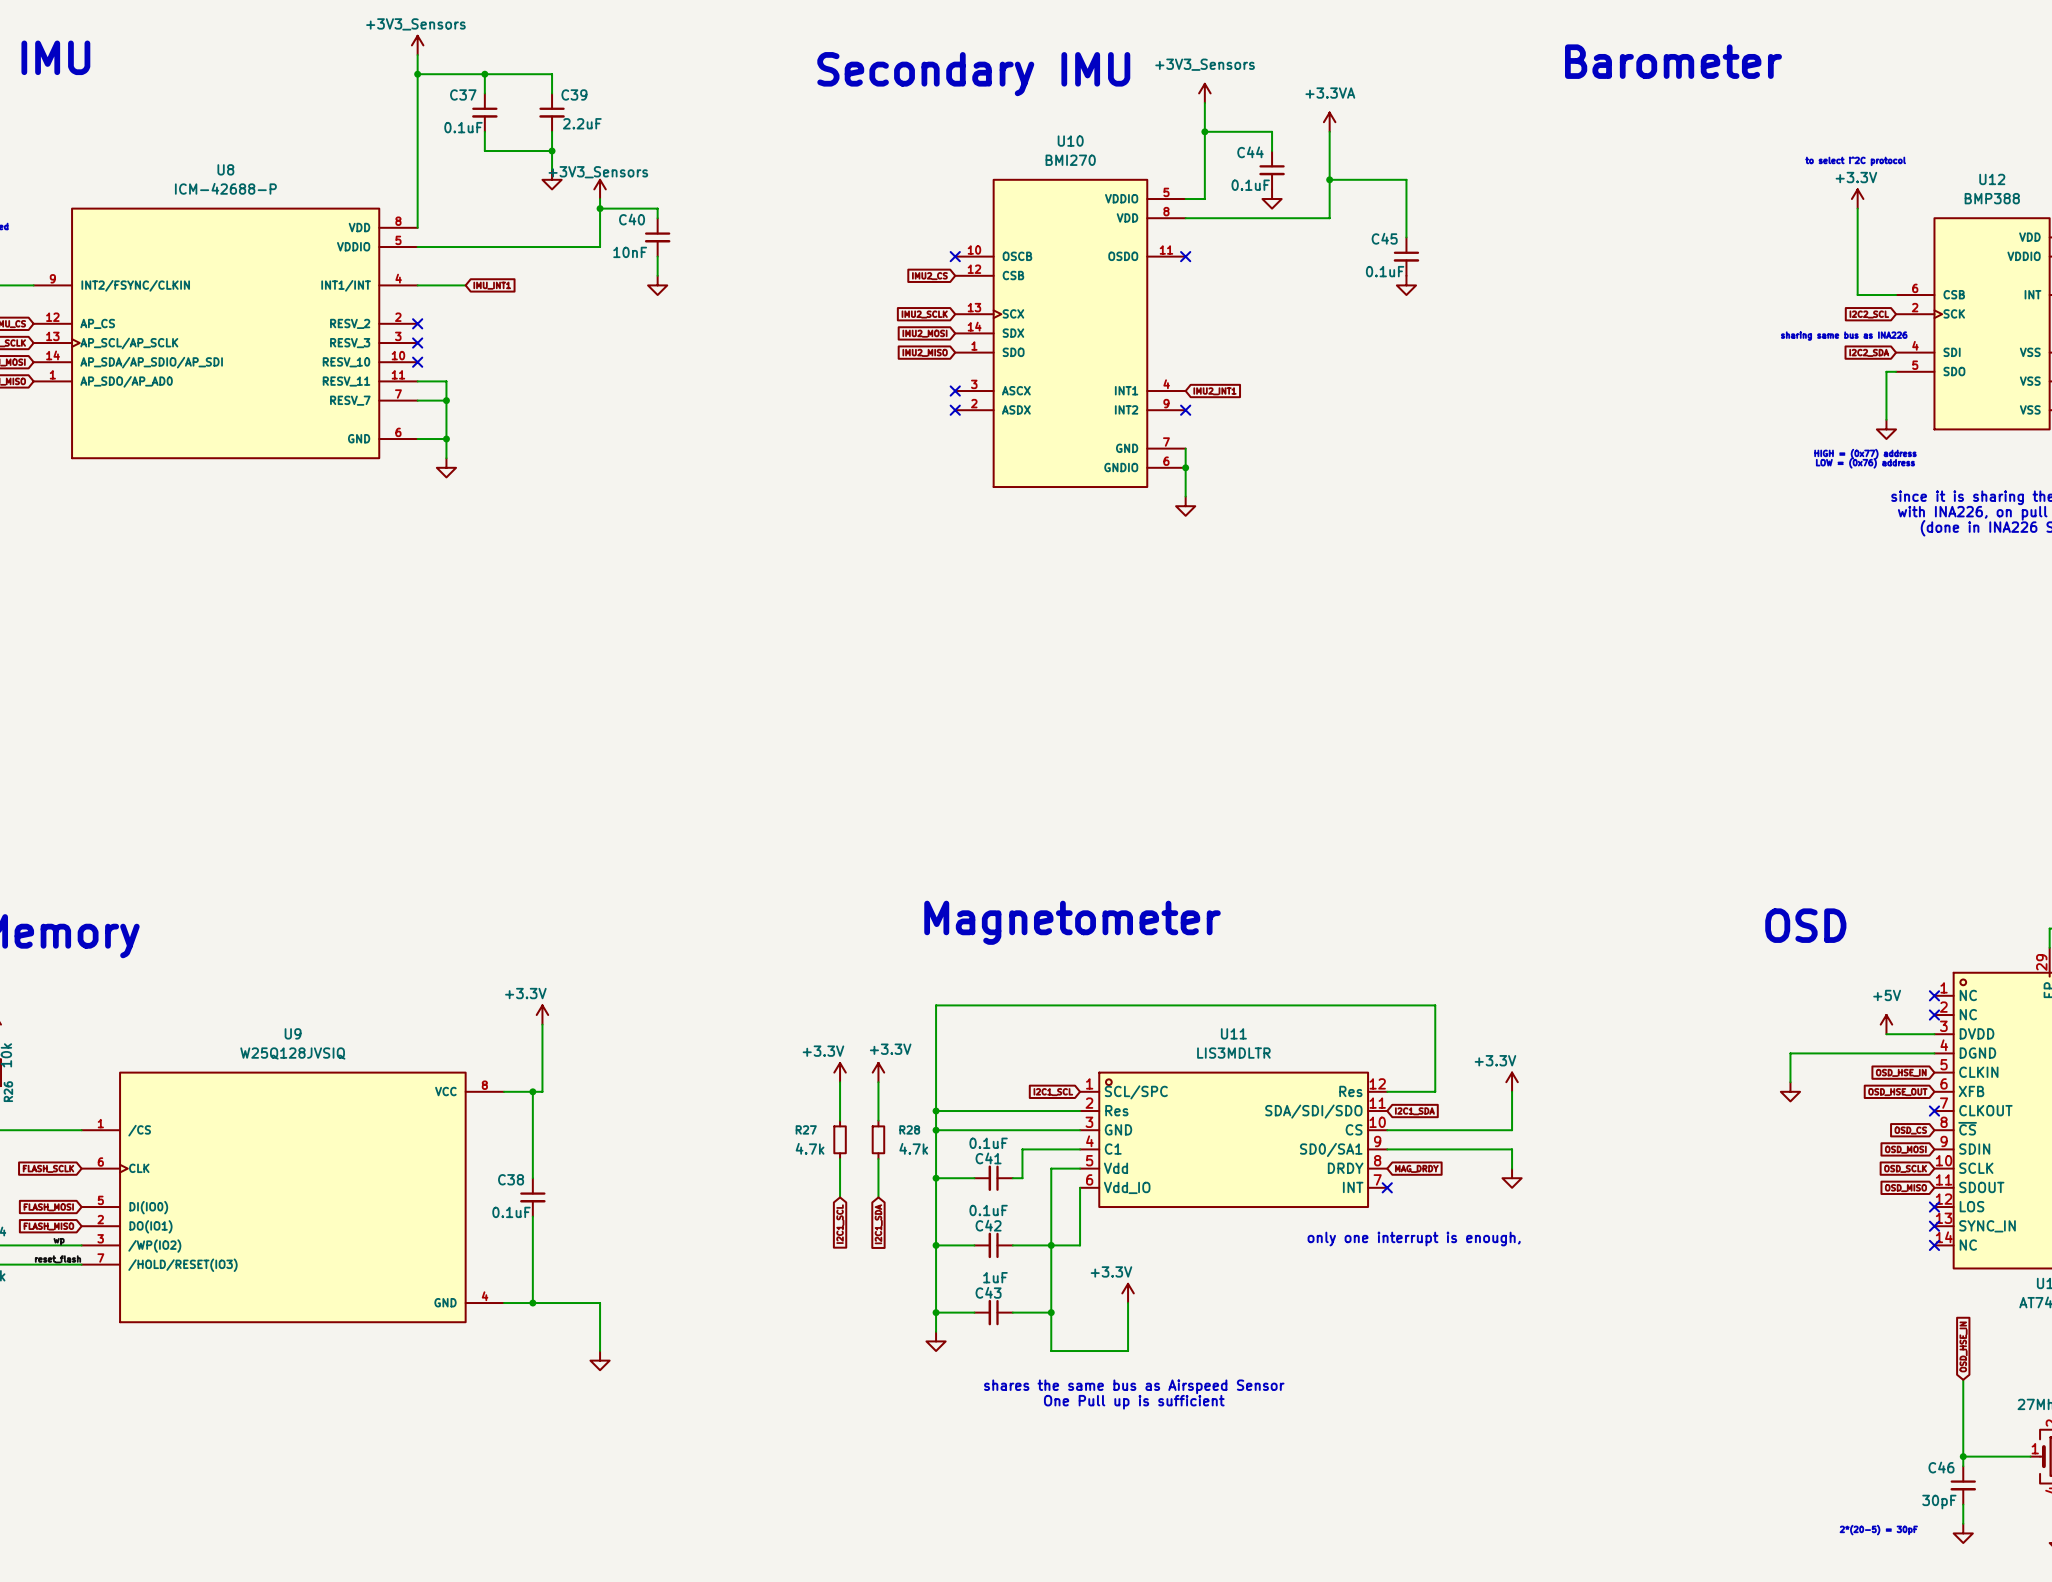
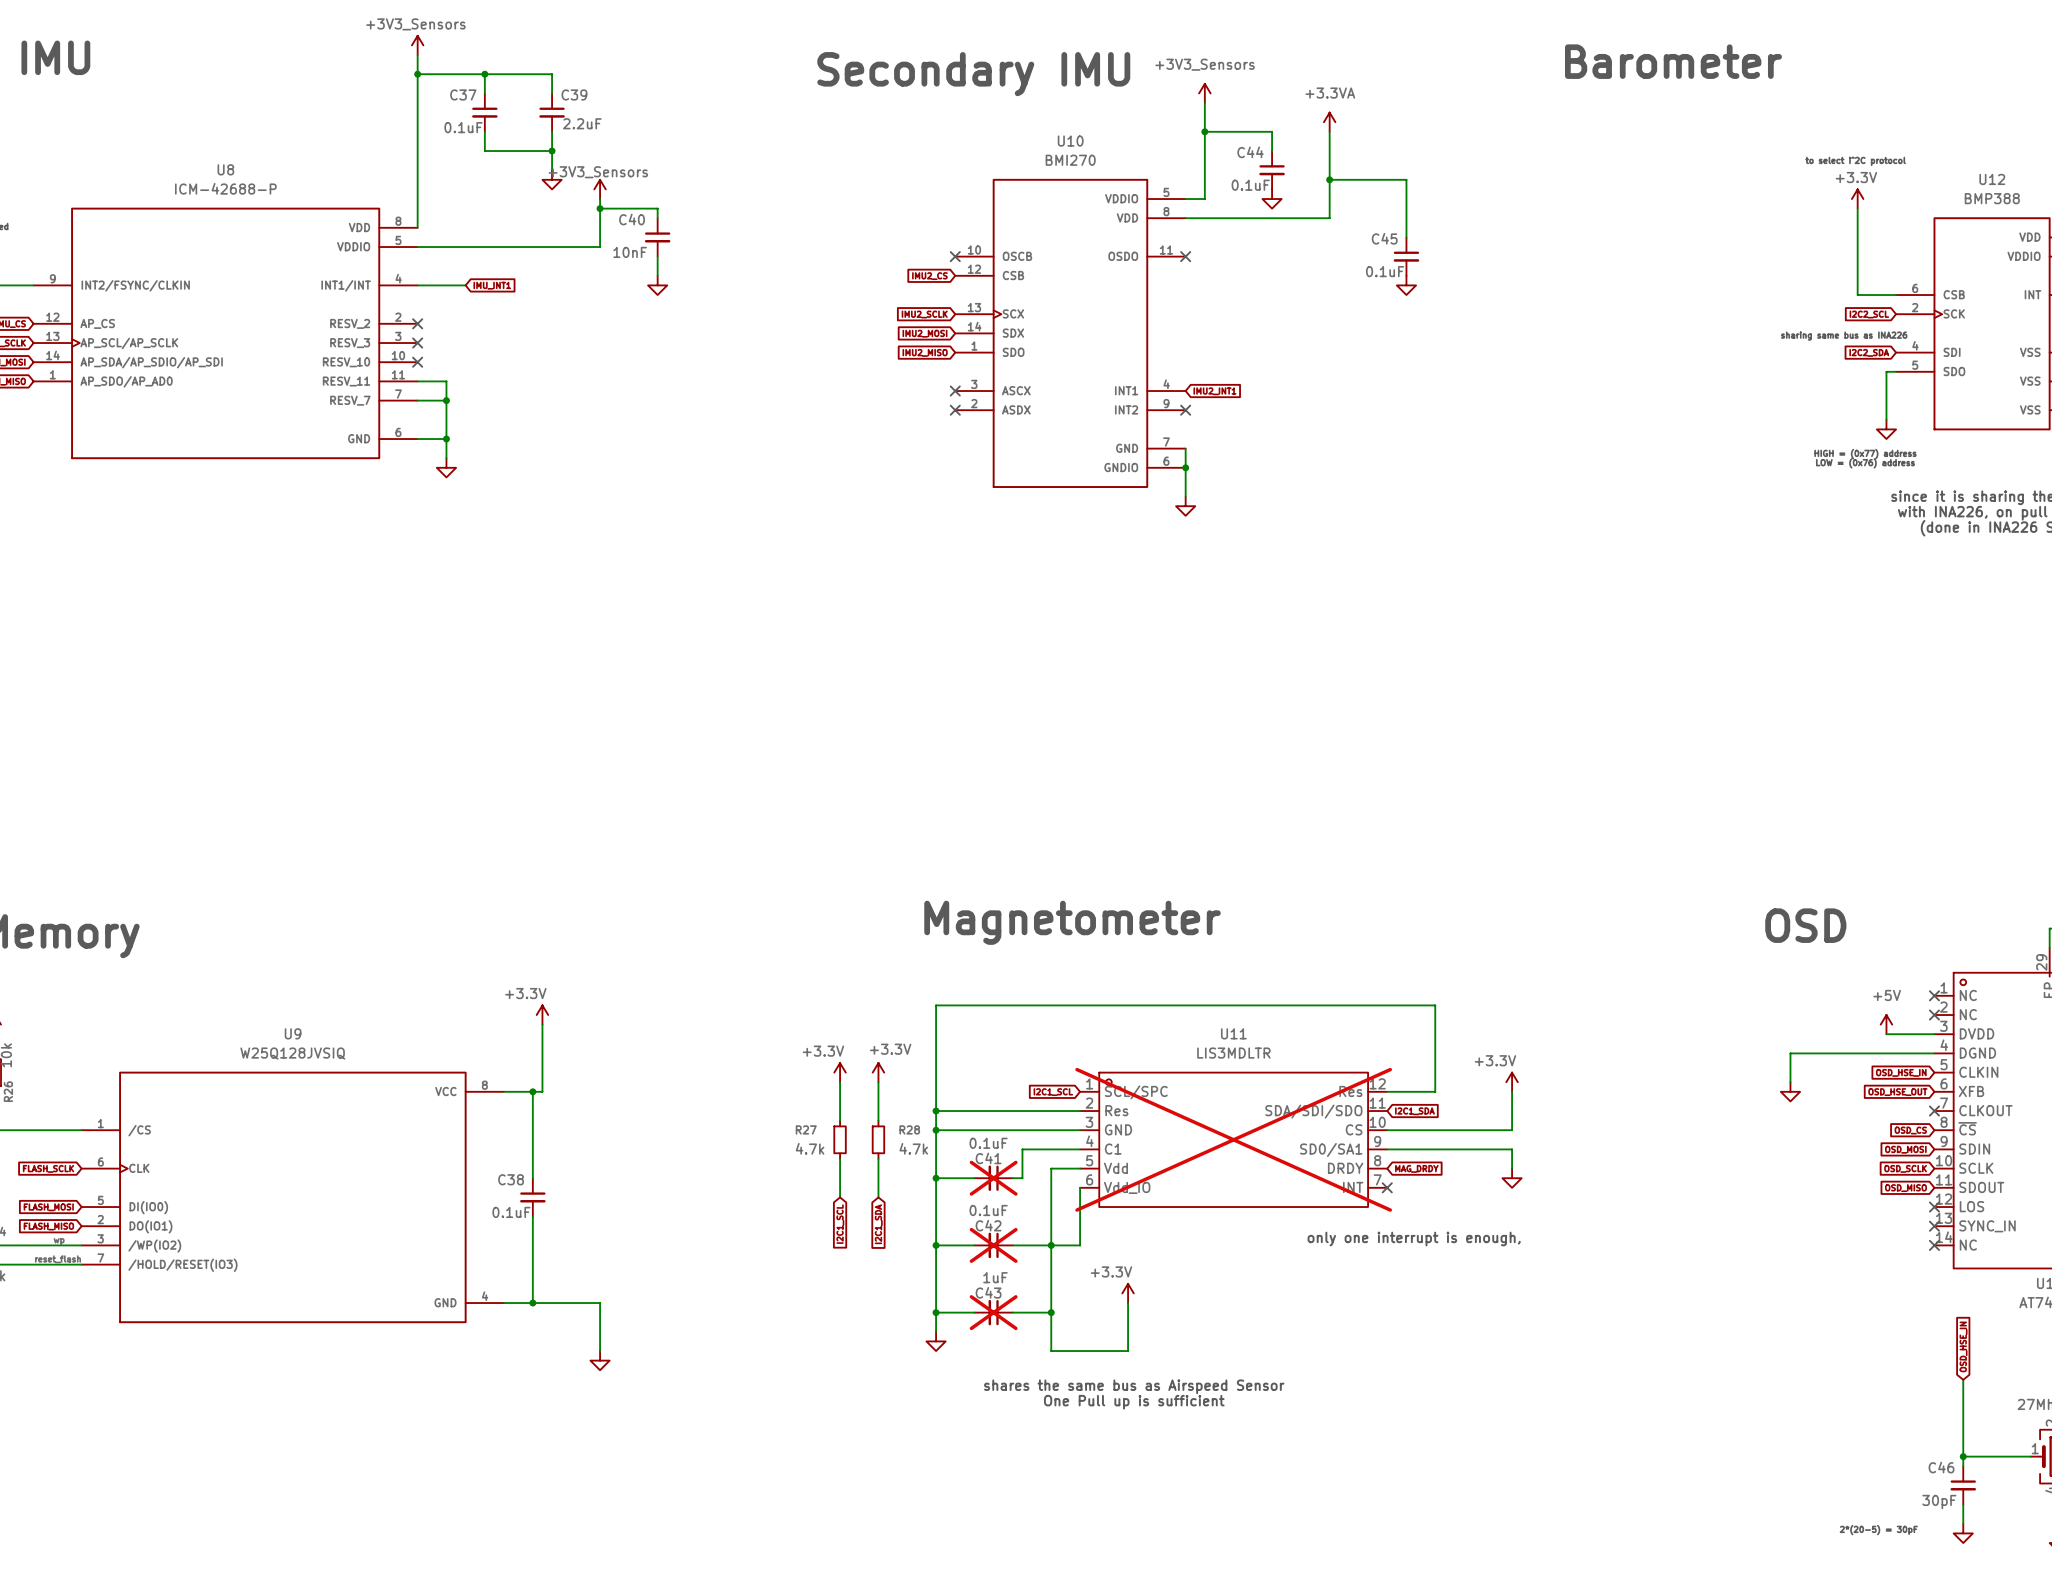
U11 do-not-place cross: none -> (1233, 1139)
C41 do-not-place cross: none -> (993, 1178)
C42 do-not-place cross: none -> (993, 1245)
C43 do-not-place cross: none -> (993, 1312)

